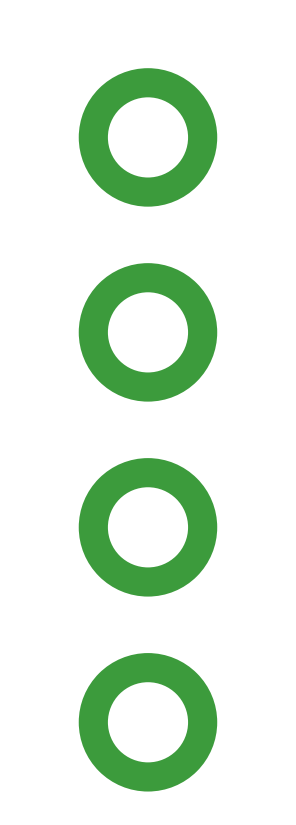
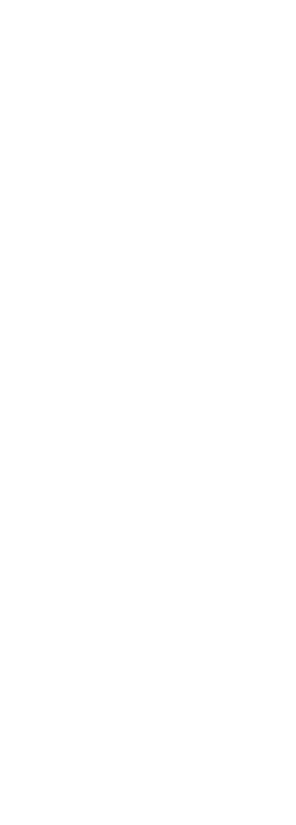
part: (147, 137) -> none
part: (147, 332) -> none
part: (147, 527) -> none
part: (147, 722) -> none

